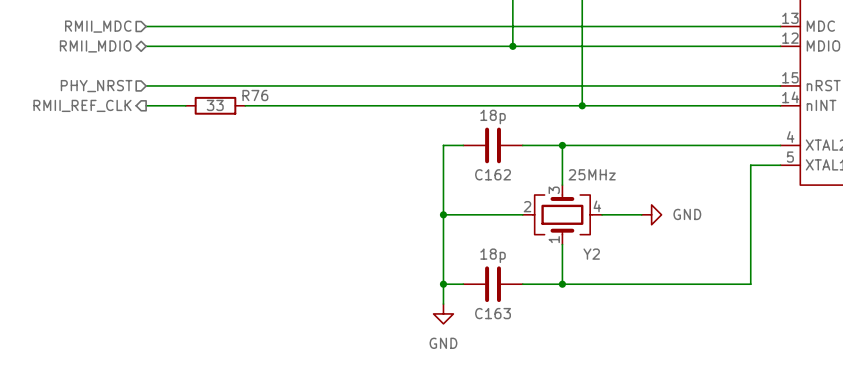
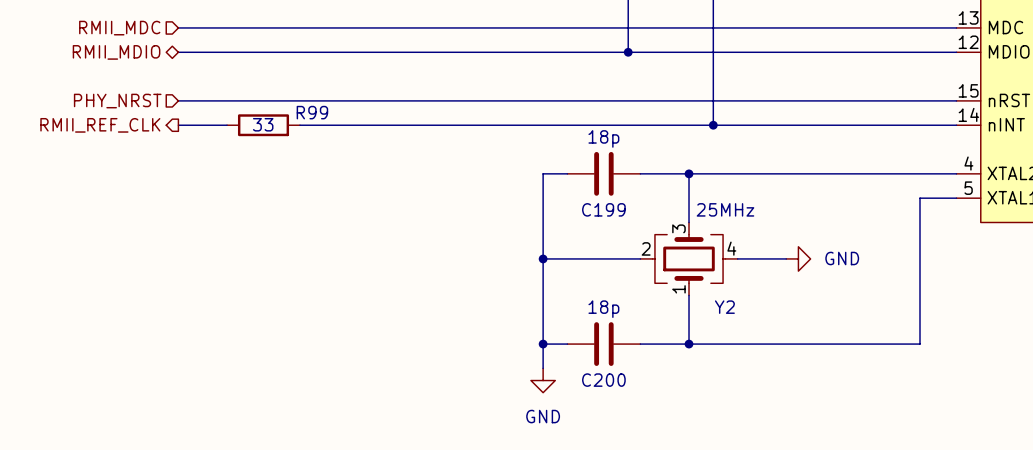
R76 name: R76 (255, 95) -> R99 (312, 112)
C162 name: C162 (493, 174) -> C199 (603, 209)
C163 name: C163 (493, 313) -> C200 (603, 380)

